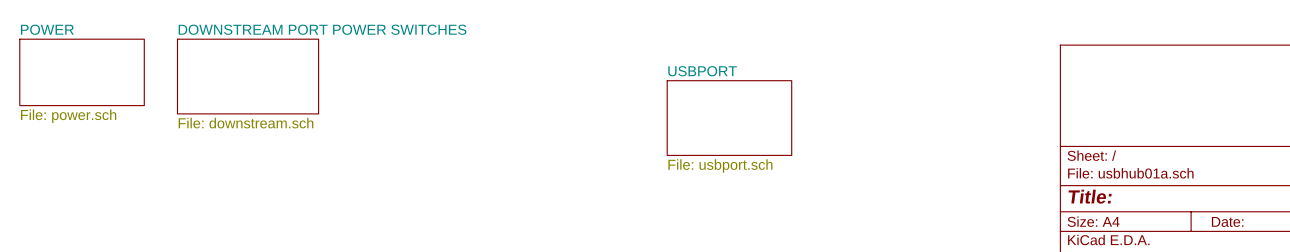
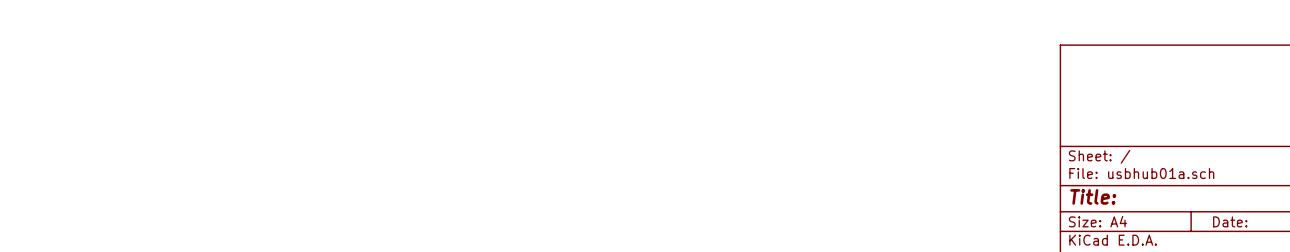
sheet POWER: File: power.sch (82, 72) -> none
sheet DOWNSTREAM PORT POWER SWITCHES: File: downstream.sch (248, 76) -> none
sheet USBPORT: File: usbport.sch (729, 118) -> none

